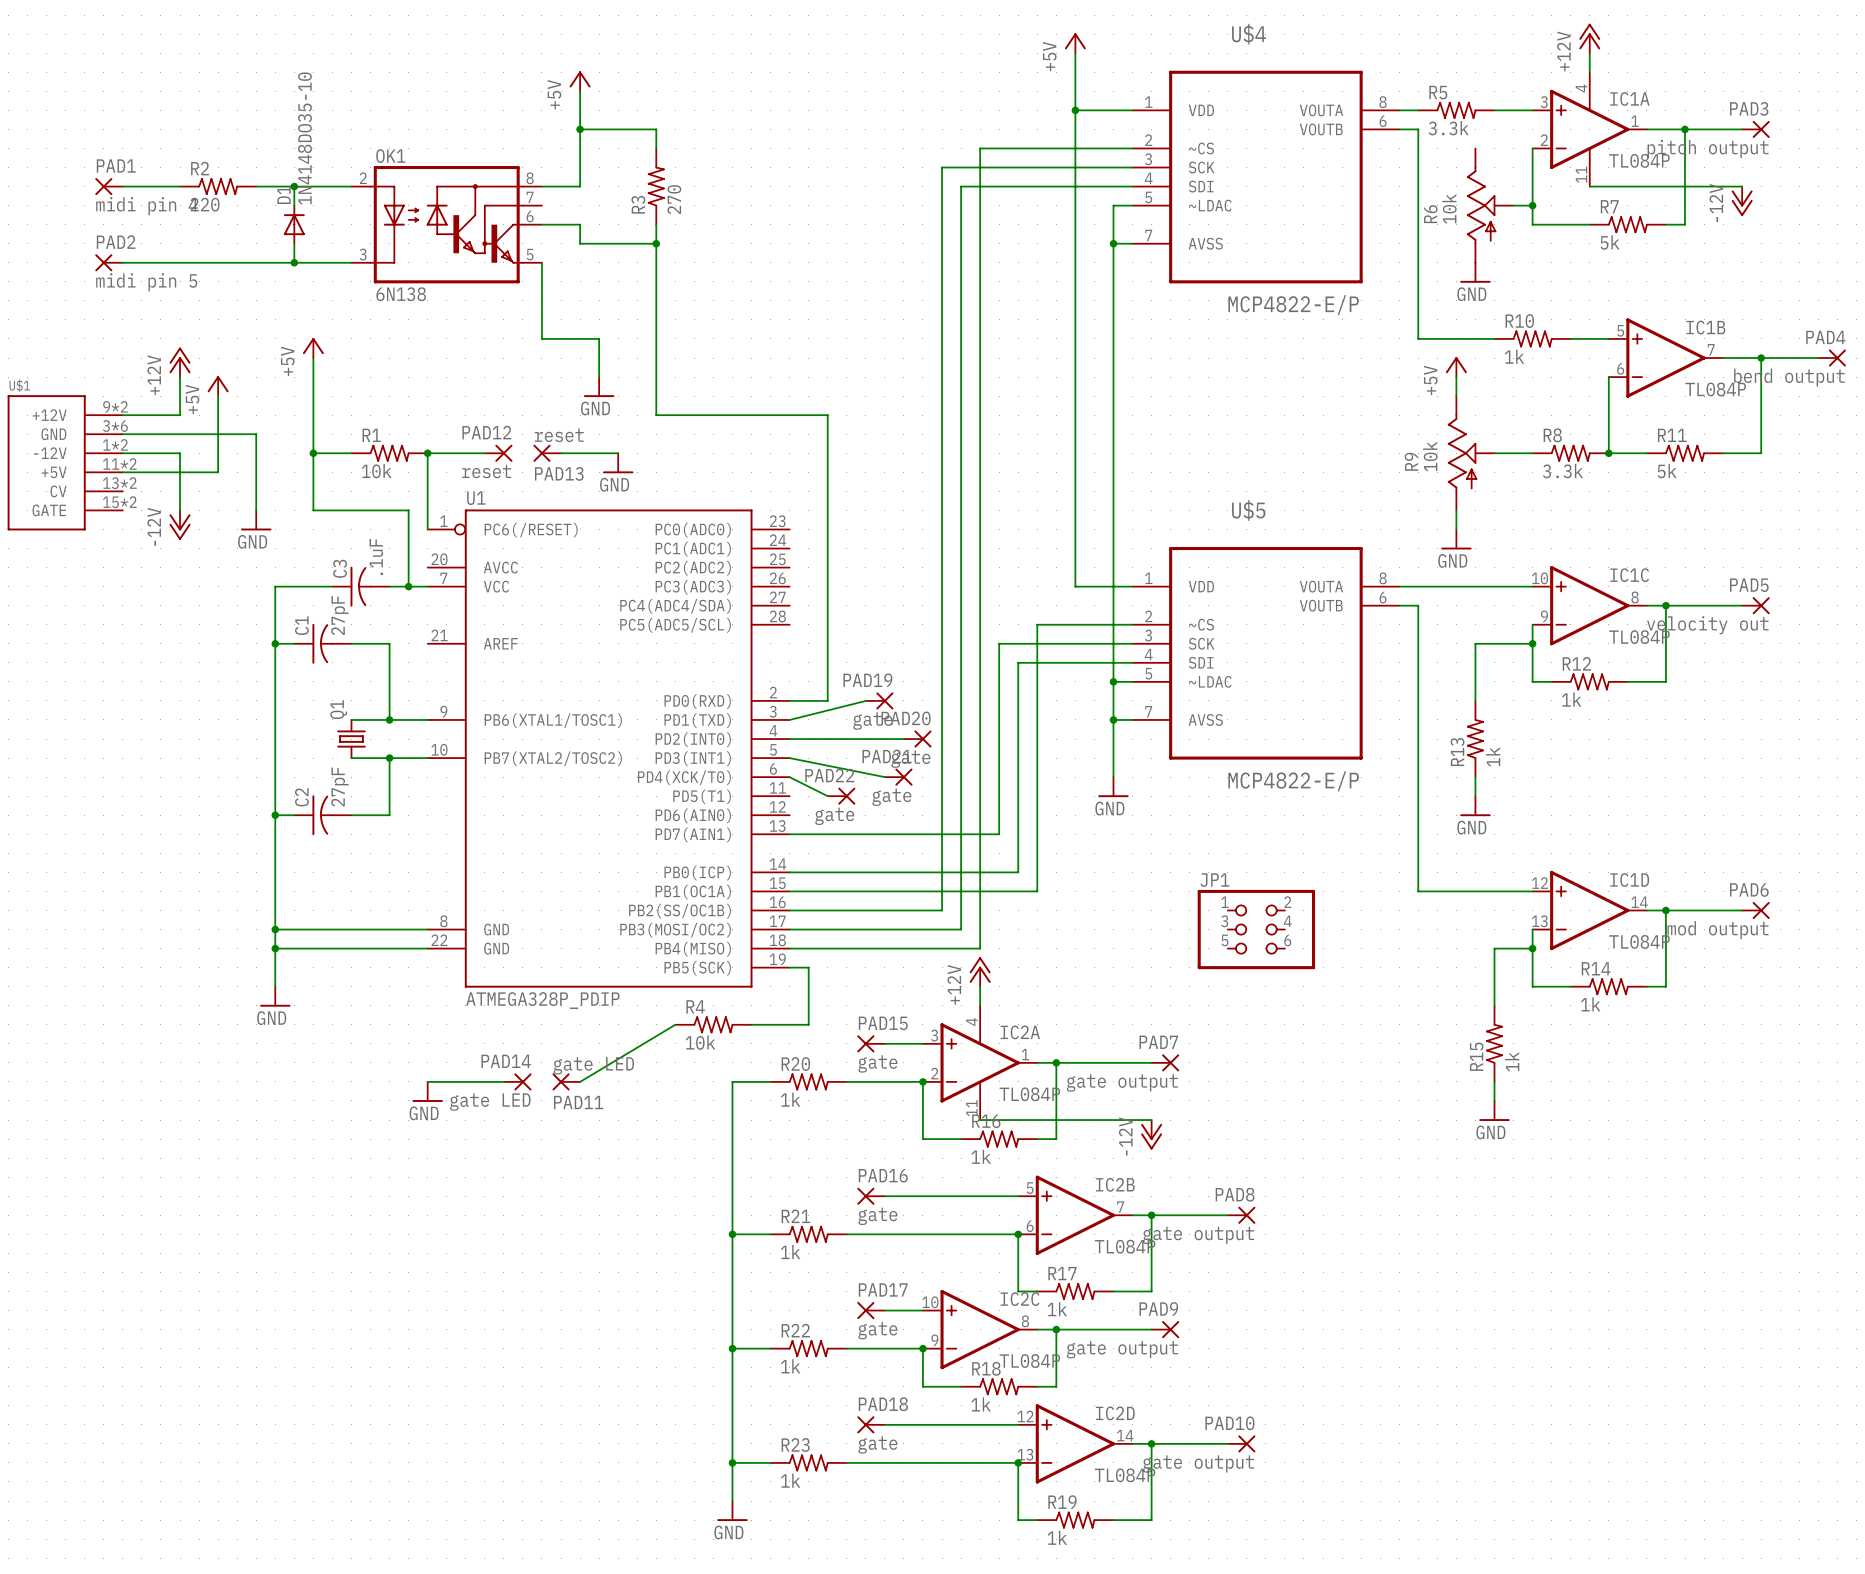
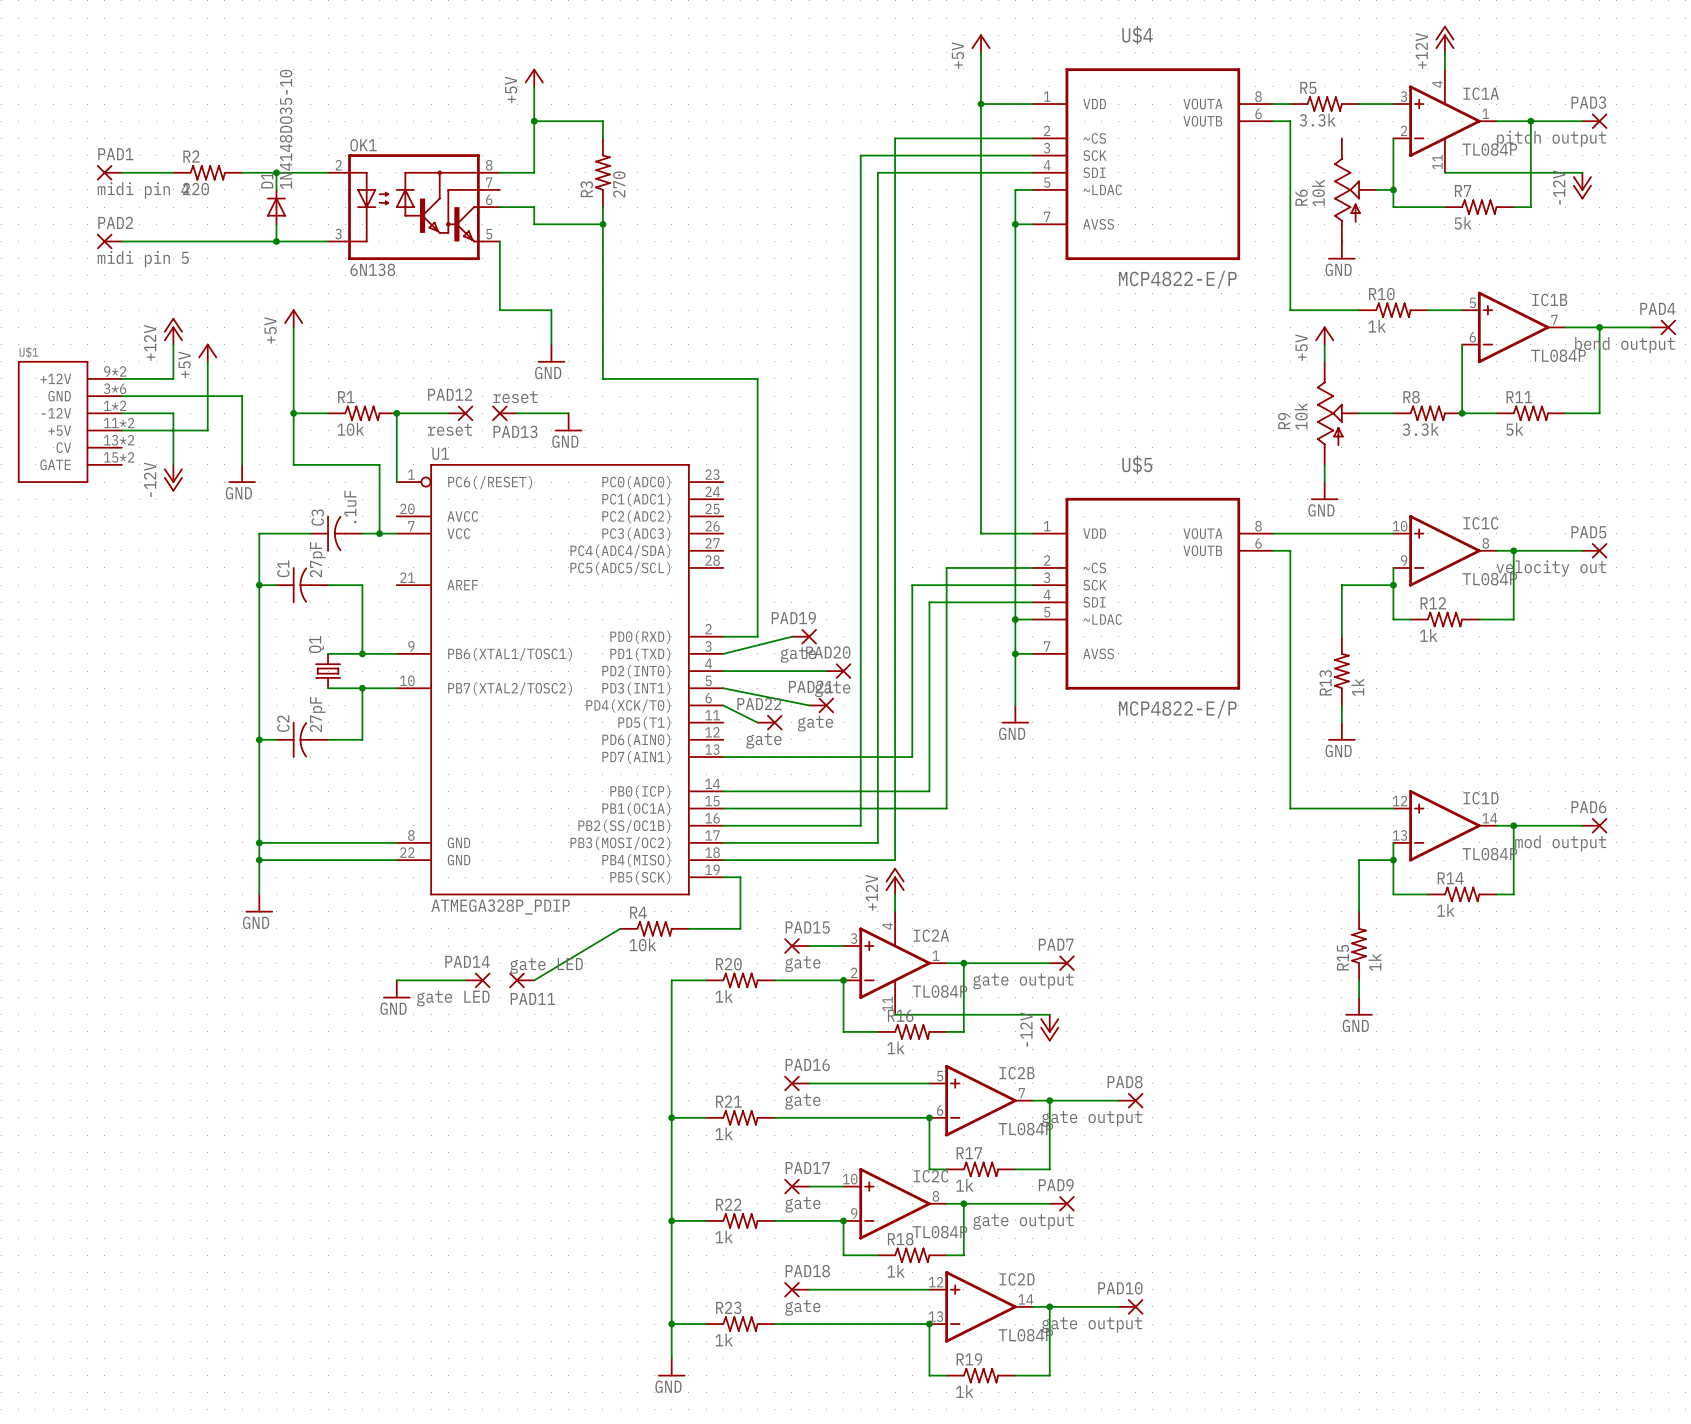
JP1: (1256, 929) -> none

